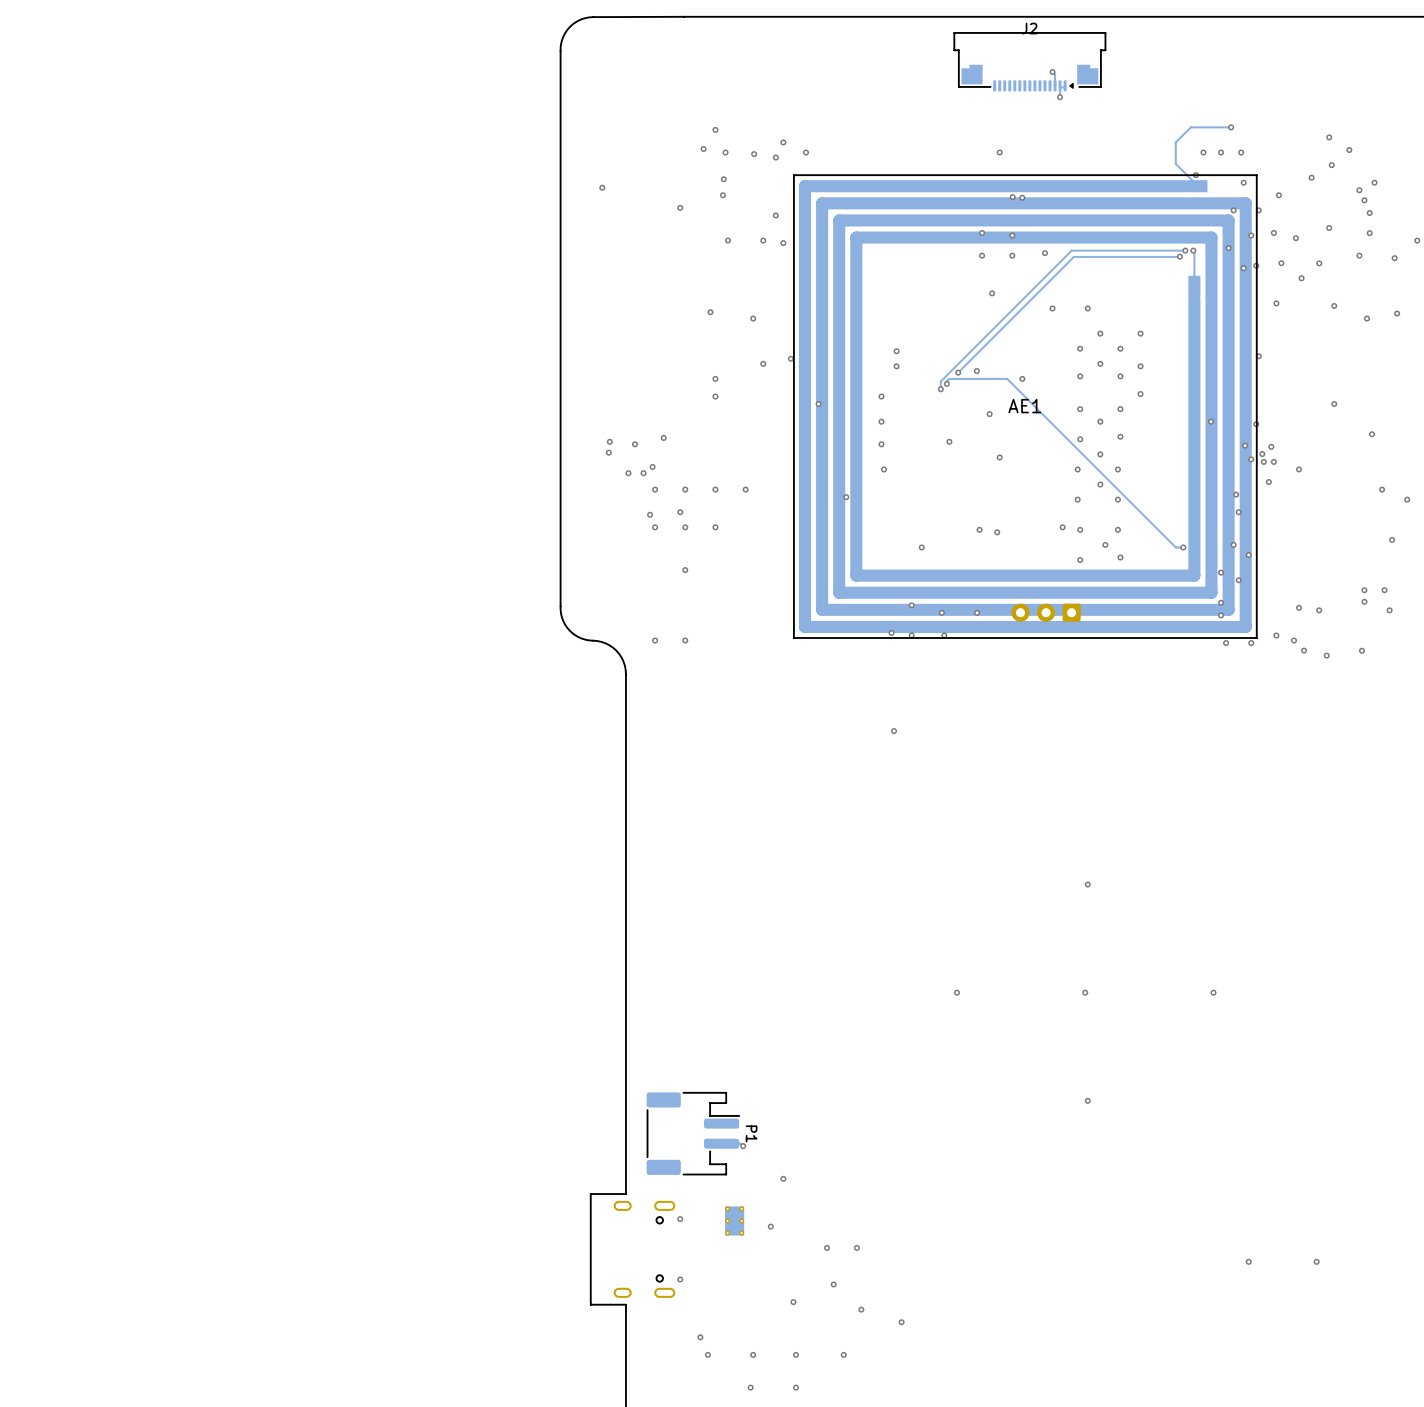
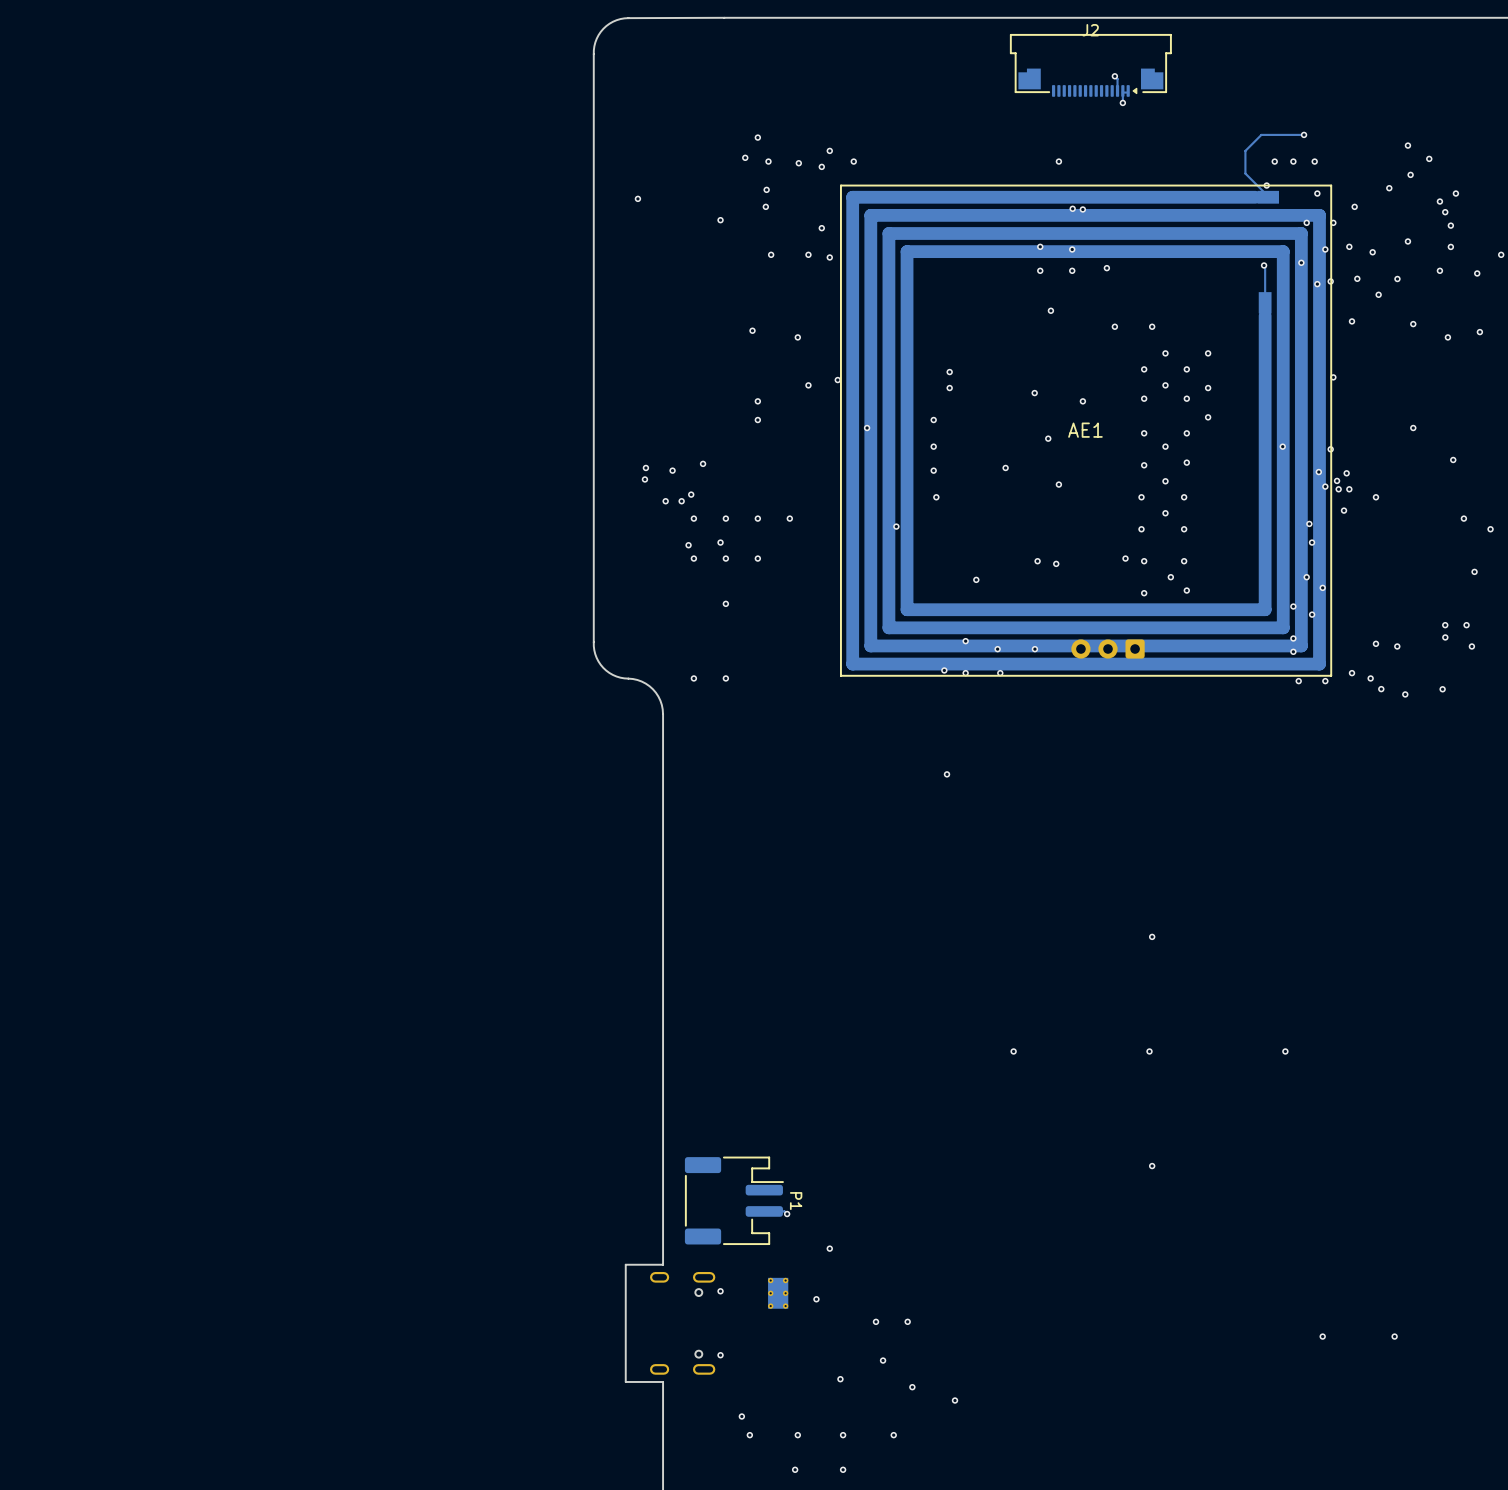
track: (1185, 250) (1071, 250) (940, 381) (940, 389) -> none
via: (1185, 250) -> none
track: (1179, 256) (1073, 256) (958, 372) -> none
via: (1179, 256) -> none
via: (958, 372) -> none
track: (946, 383) (949, 378) (1007, 378) (1175, 547) (1183, 547) -> none
via: (946, 383) -> none
via: (940, 389) -> none
via: (1183, 547) -> none

